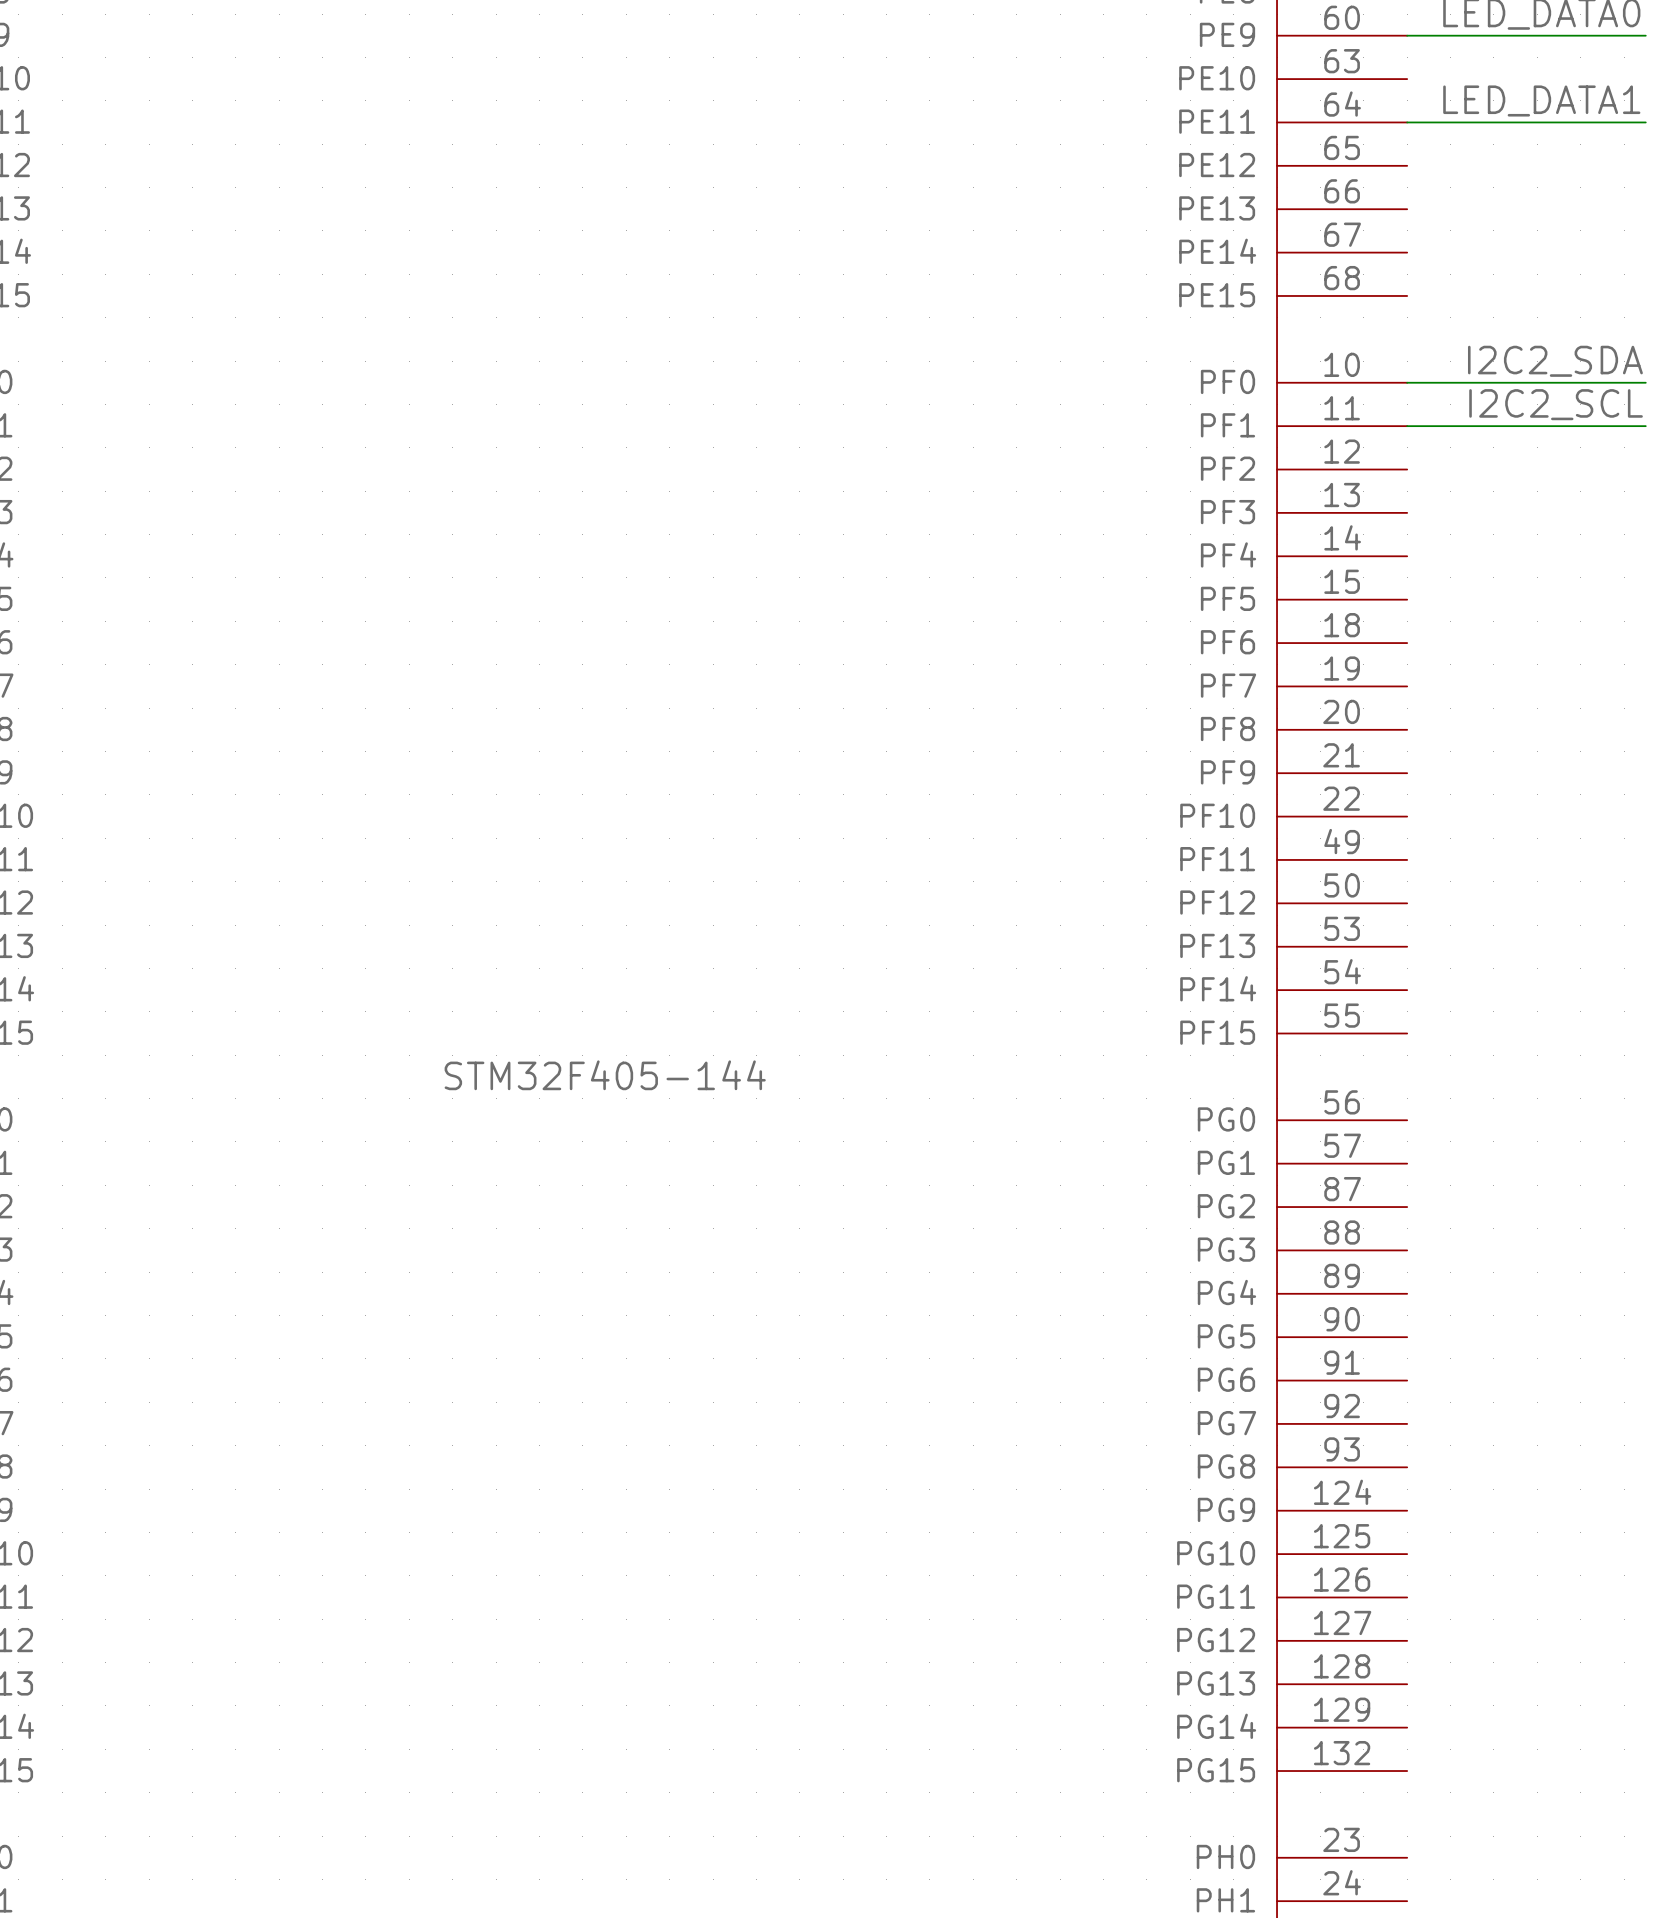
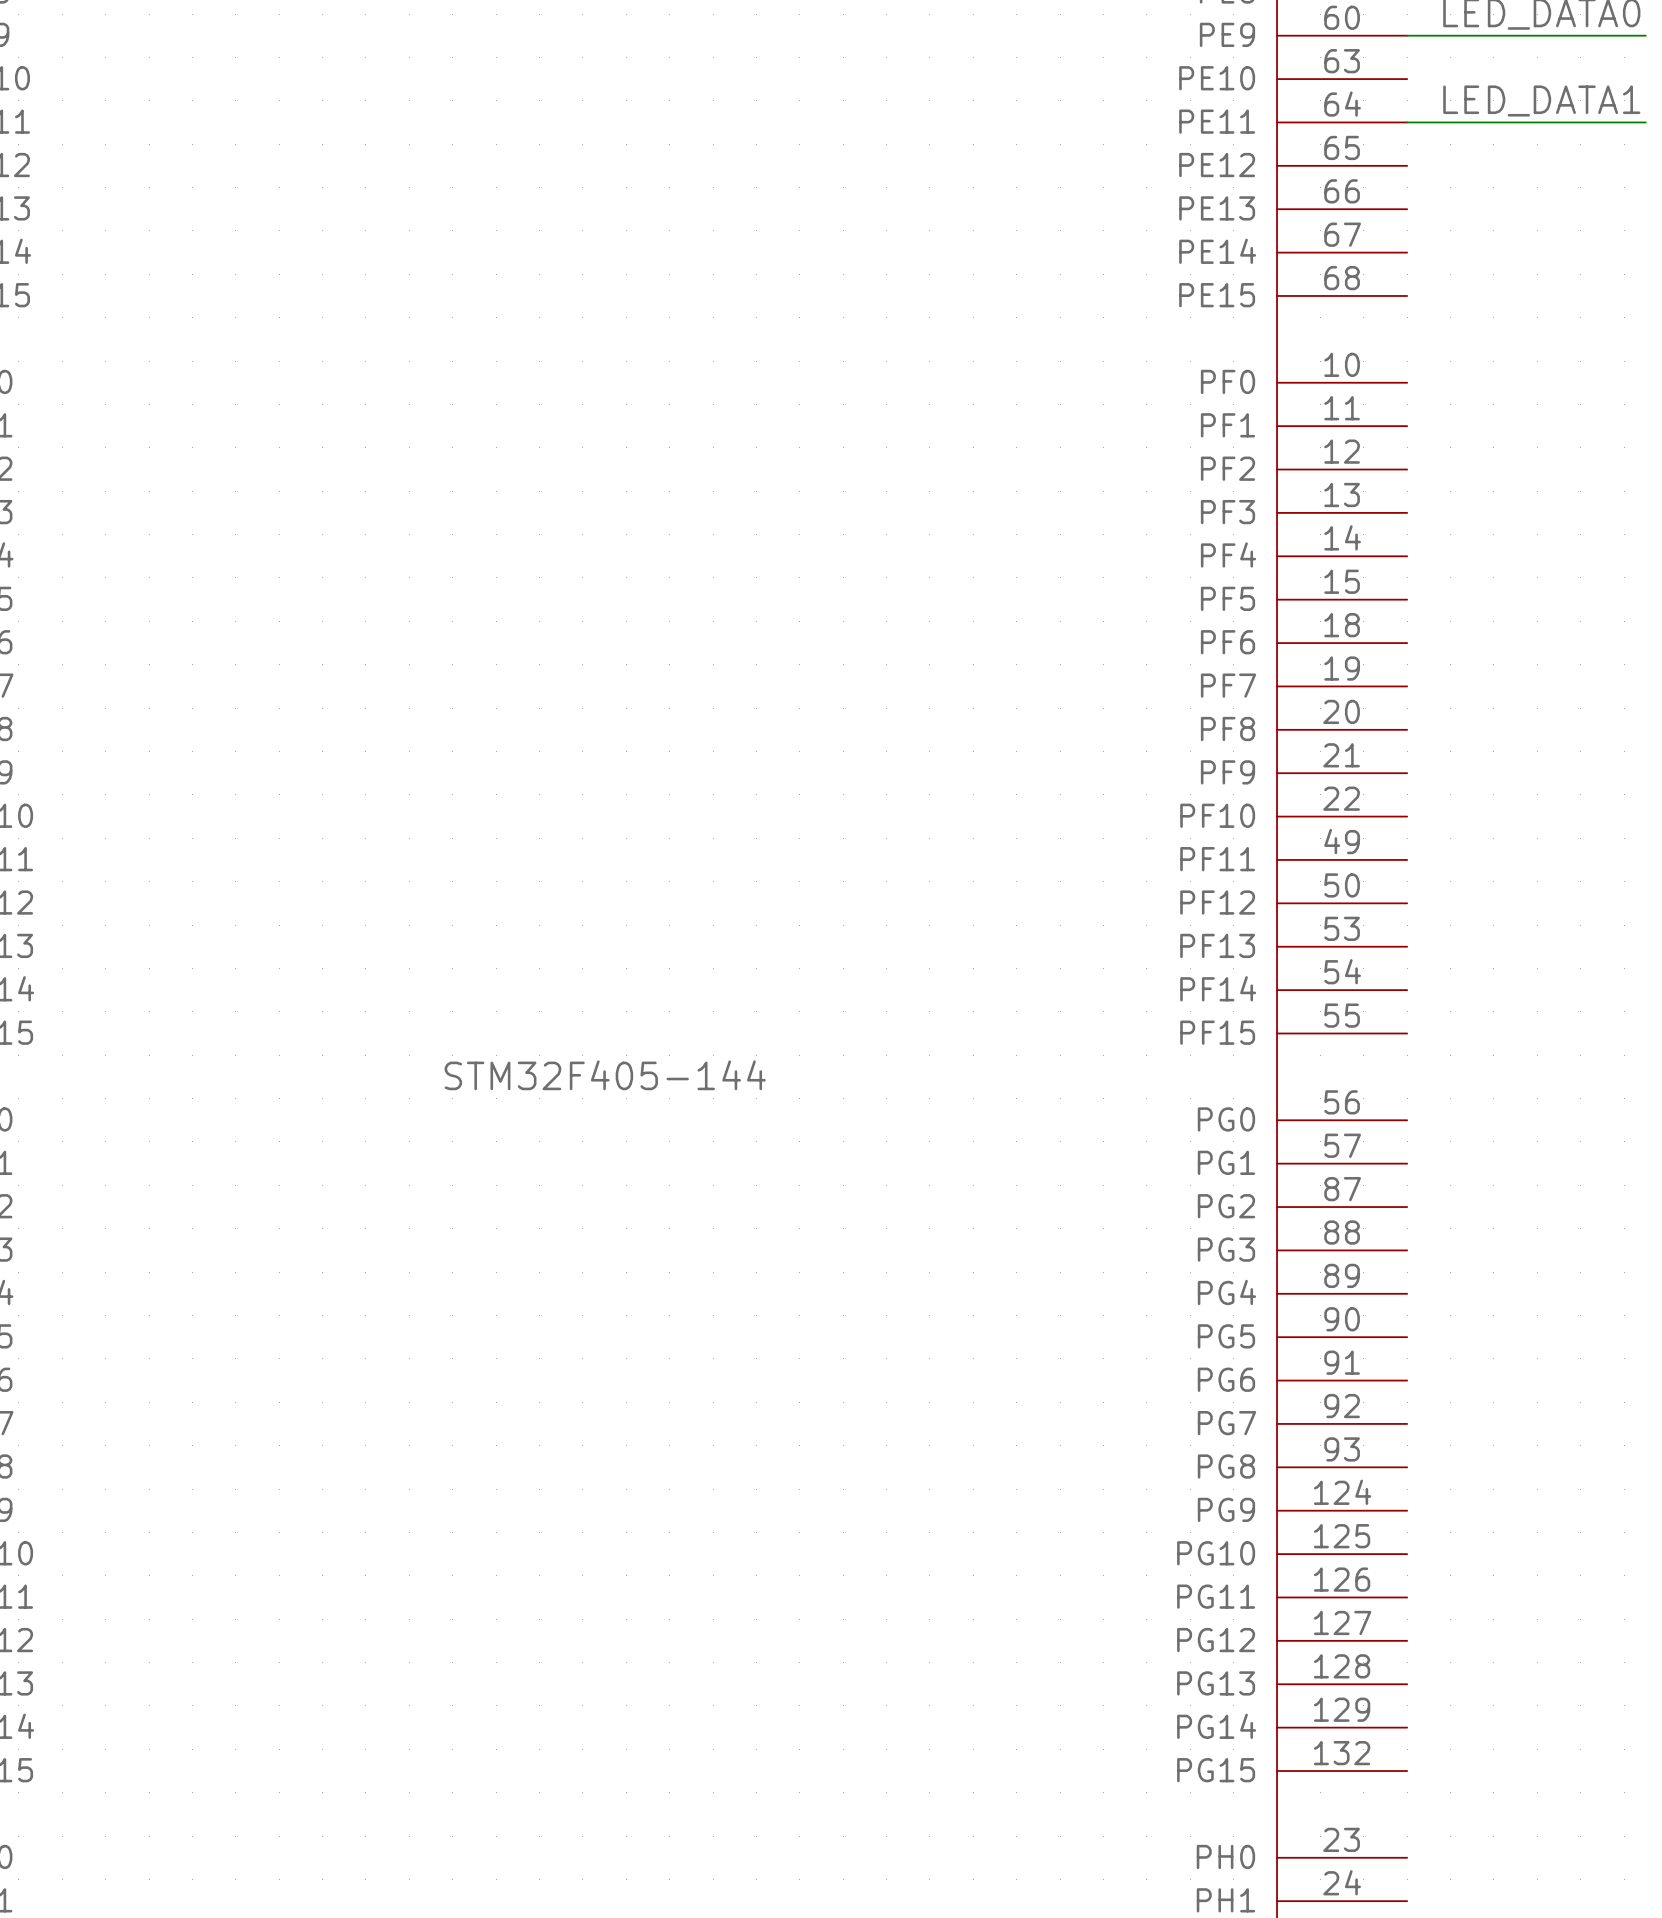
label: I2C2_SDA (1555, 361) -> none
wire: (1407, 382) (1645, 382) -> none
label: I2C2_SCL (1556, 404) -> none
wire: (1407, 426) (1645, 426) -> none

